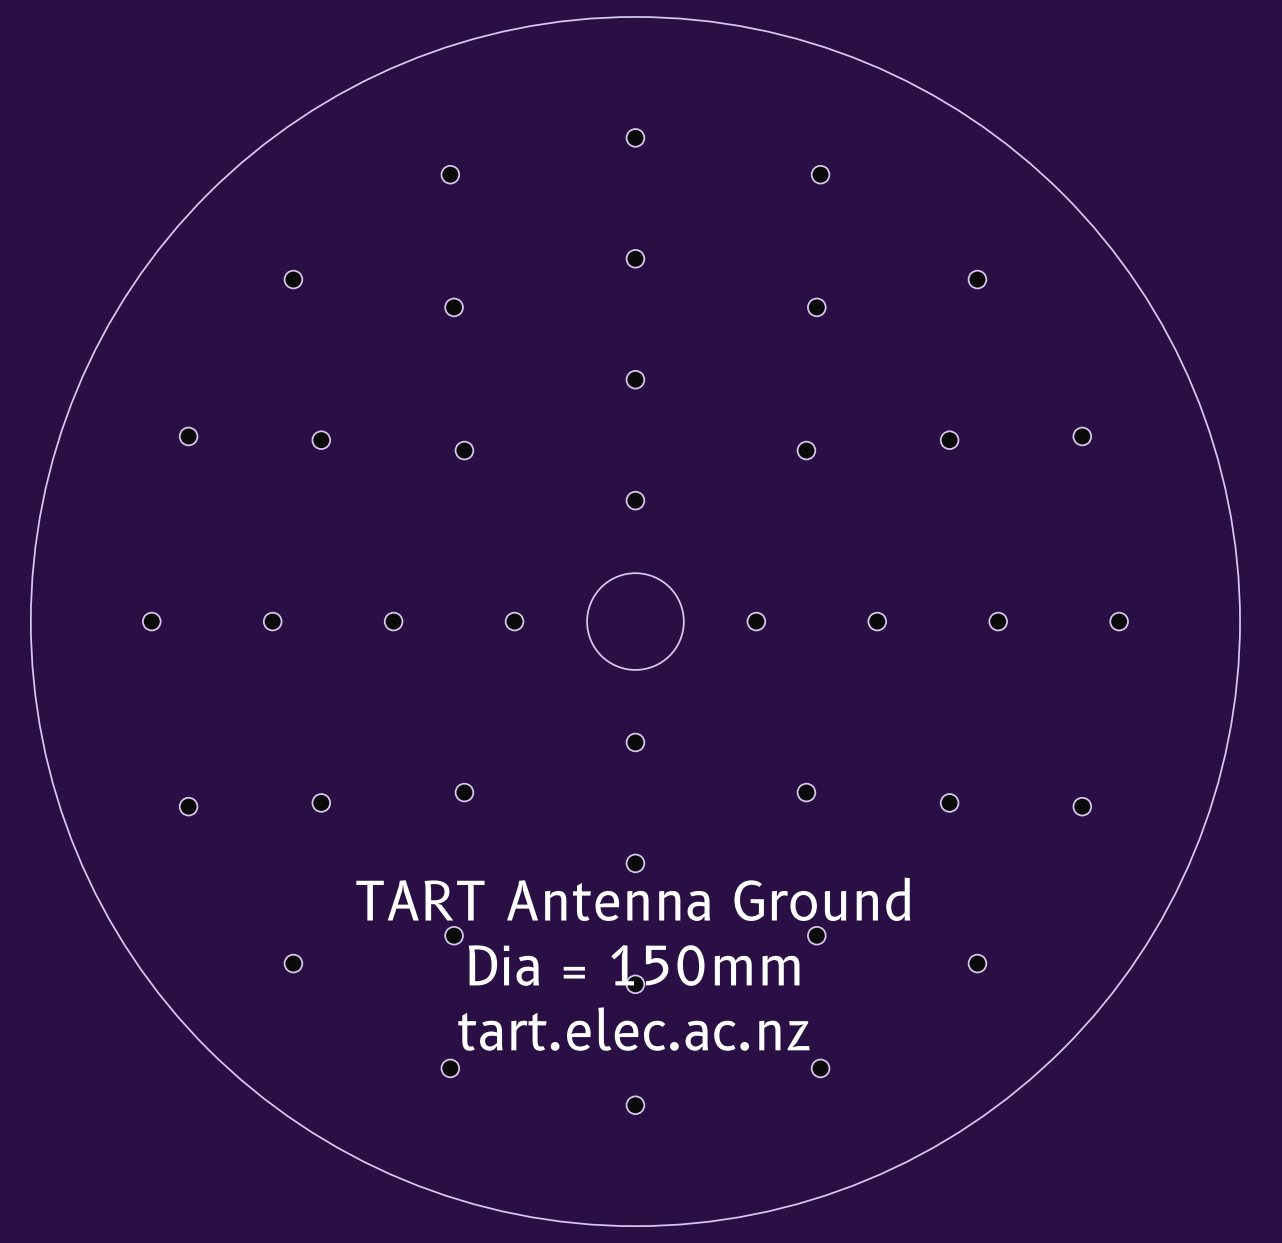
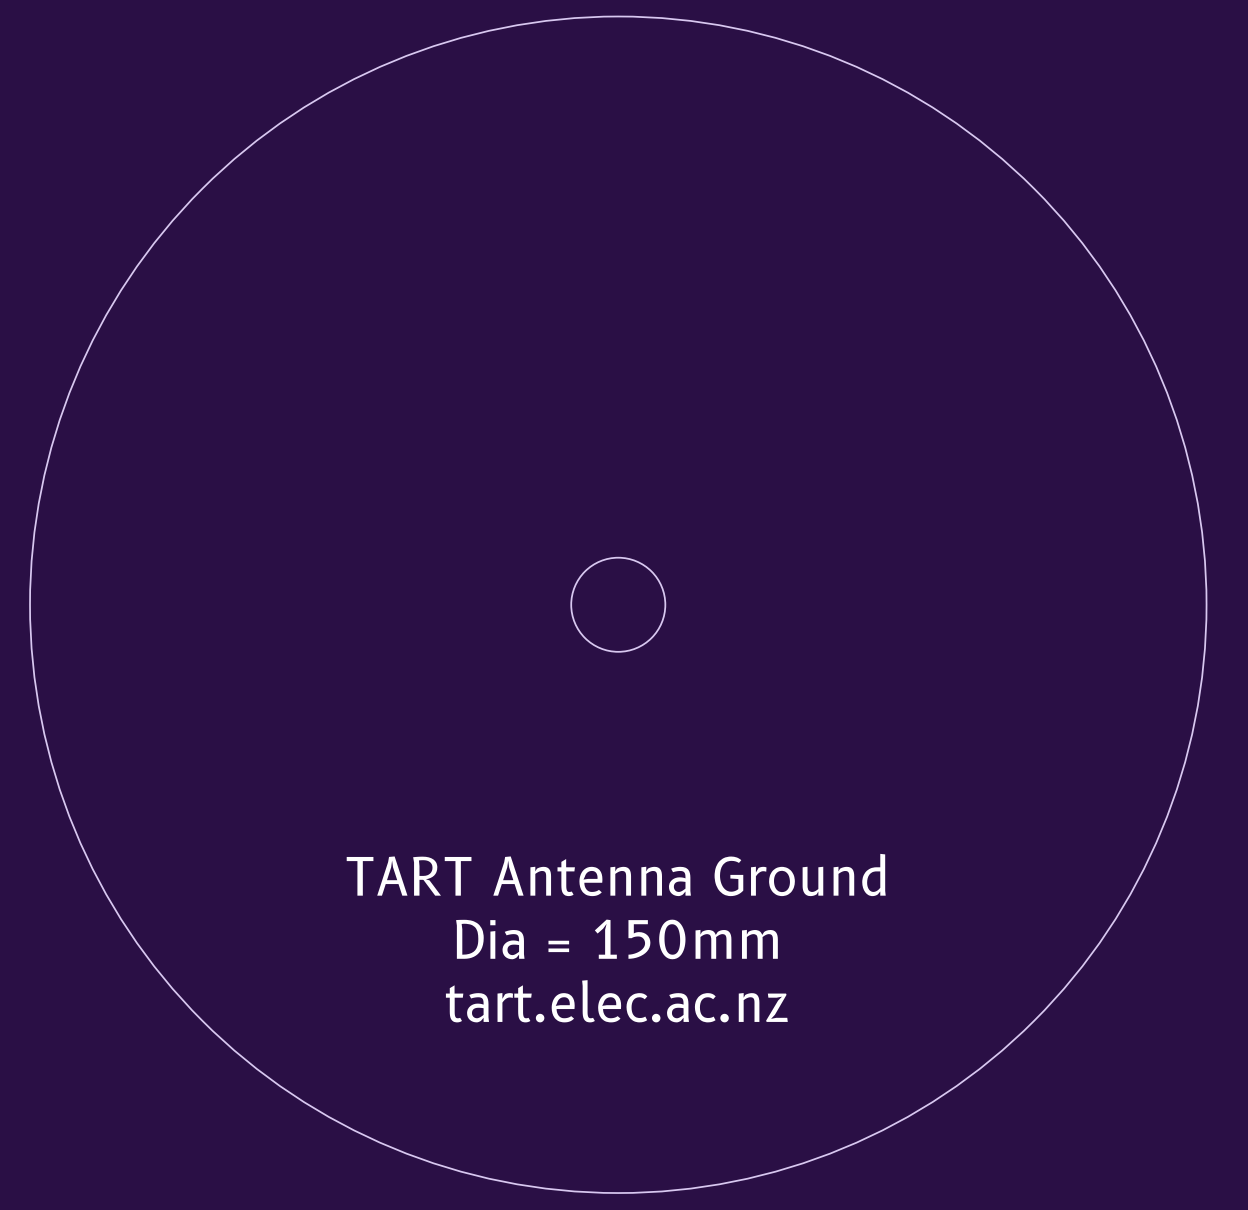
part: (635, 137) -> none
part: (450, 174) -> none
part: (820, 174) -> none
part: (635, 258) -> none
part: (293, 279) -> none
part: (977, 279) -> none
part: (454, 307) -> none
part: (816, 307) -> none
part: (635, 379) -> none
part: (188, 436) -> none
part: (1082, 436) -> none
part: (321, 440) -> none
part: (949, 440) -> none
part: (464, 450) -> none
part: (806, 450) -> none
part: (635, 500) -> none
part: (151, 621) -> none
part: (272, 621) -> none
part: (393, 621) -> none
part: (514, 621) -> none
part: (756, 621) -> none
part: (877, 621) -> none
part: (998, 621) -> none
part: (1119, 621) -> none
part: (635, 742) -> none
part: (464, 792) -> none
part: (806, 792) -> none
part: (321, 802) -> none
part: (949, 802) -> none
part: (188, 806) -> none
part: (1082, 806) -> none
part: (635, 863) -> none
part: (454, 935) -> none
part: (816, 935) -> none
part: (293, 963) -> none
part: (977, 963) -> none
part: (635, 984) -> none
part: (450, 1068) -> none
part: (820, 1068) -> none
part: (635, 1105) -> none

